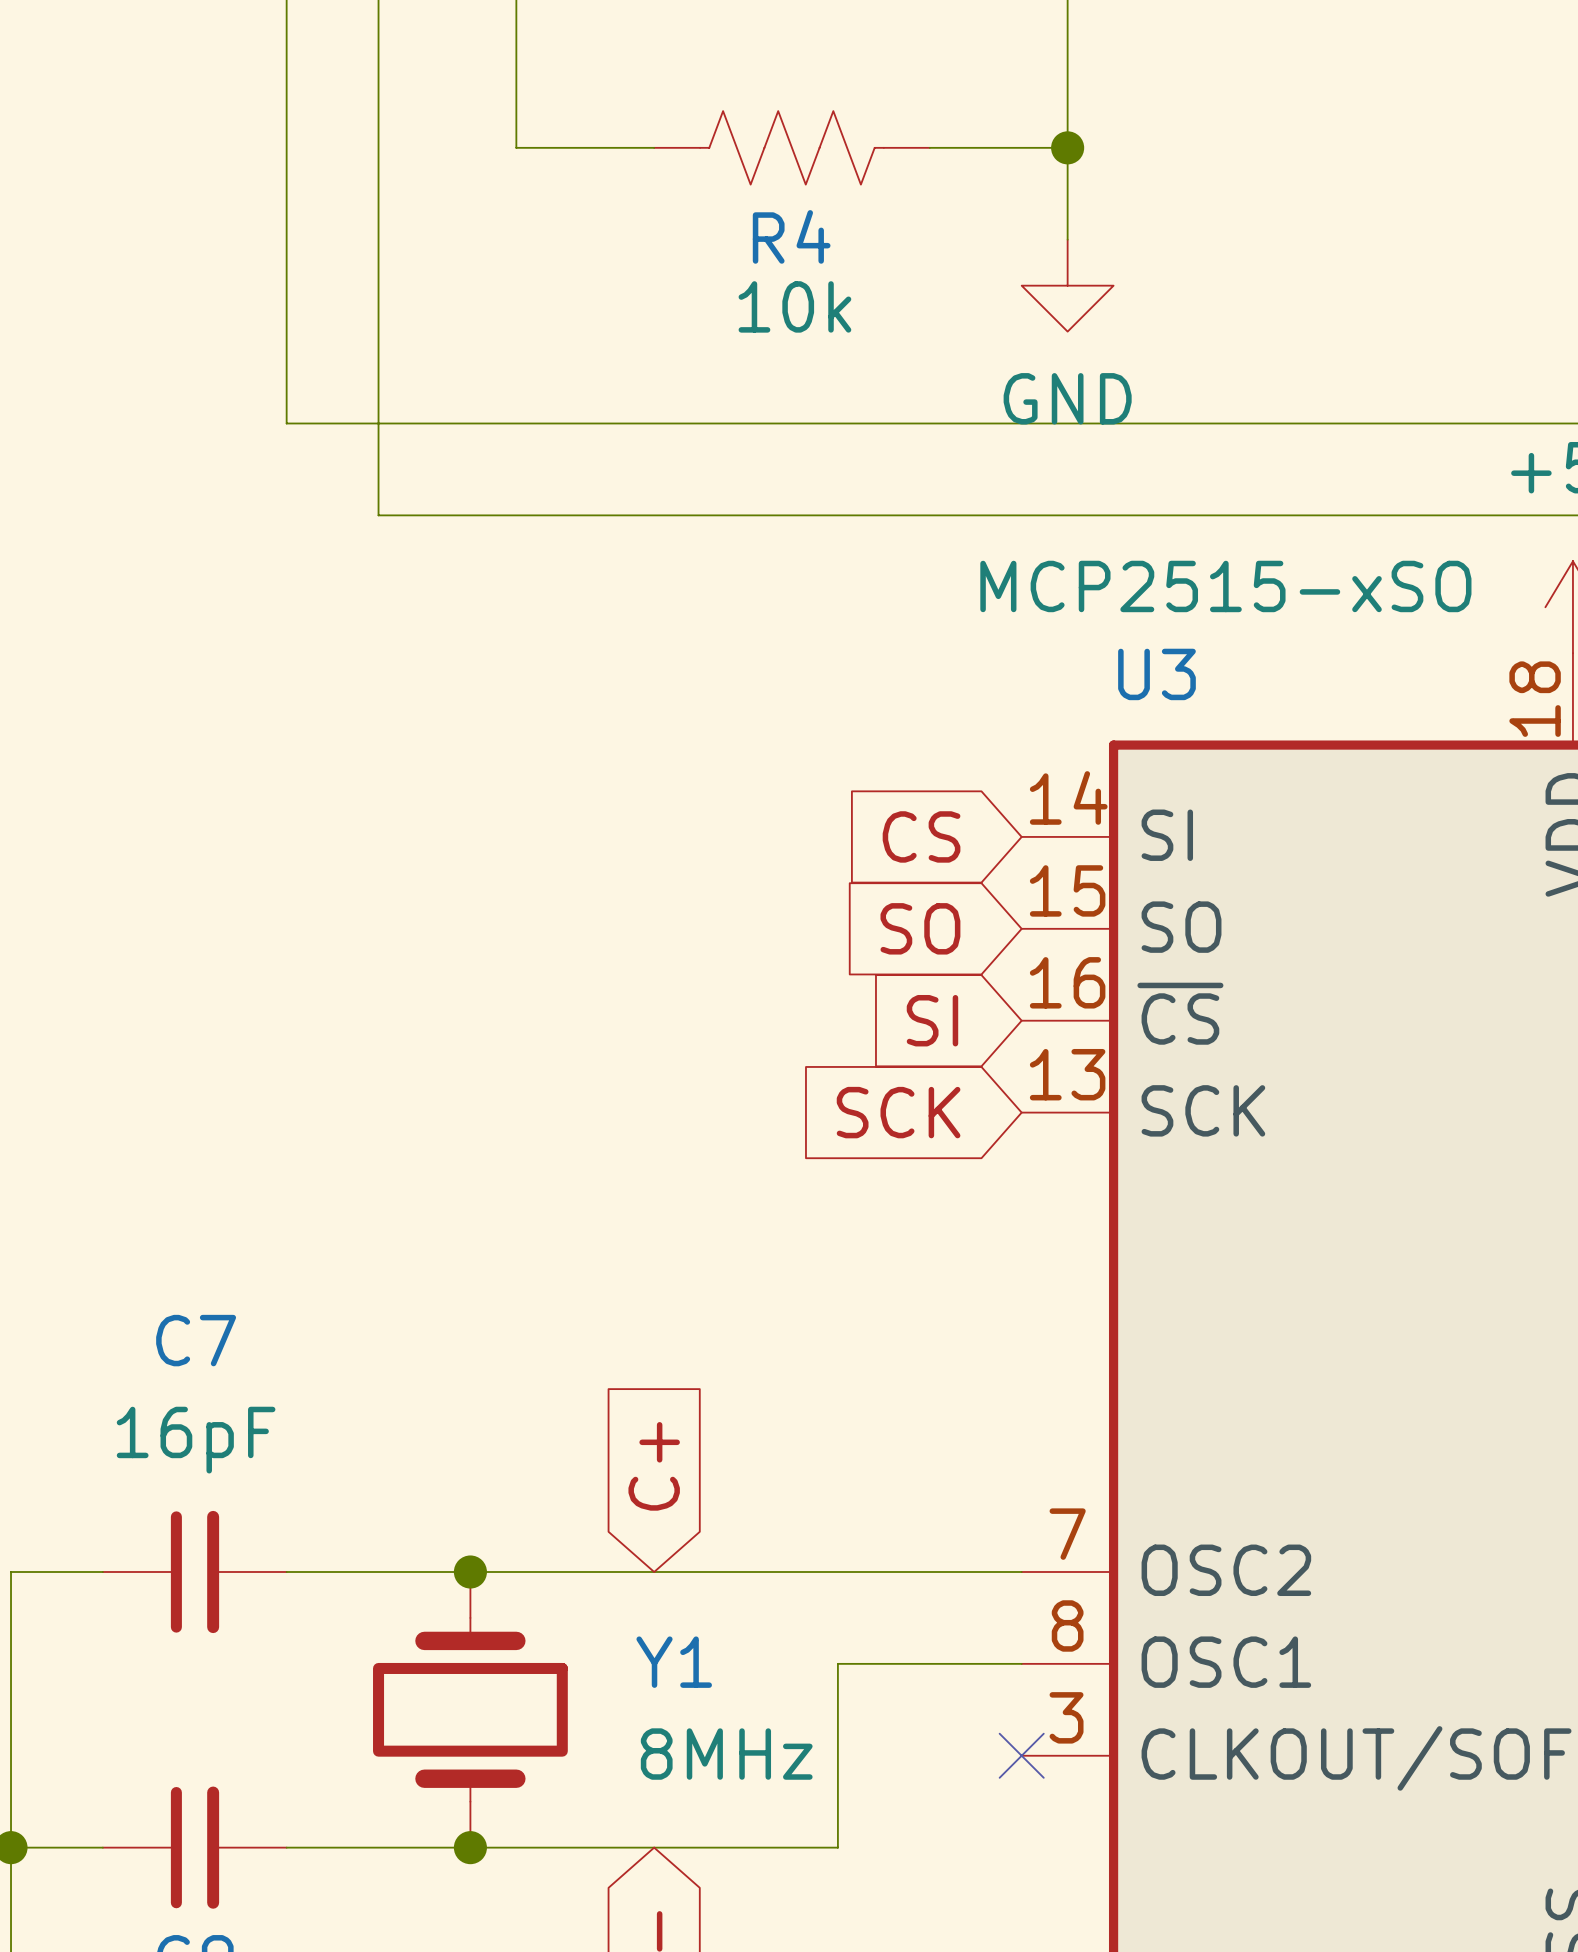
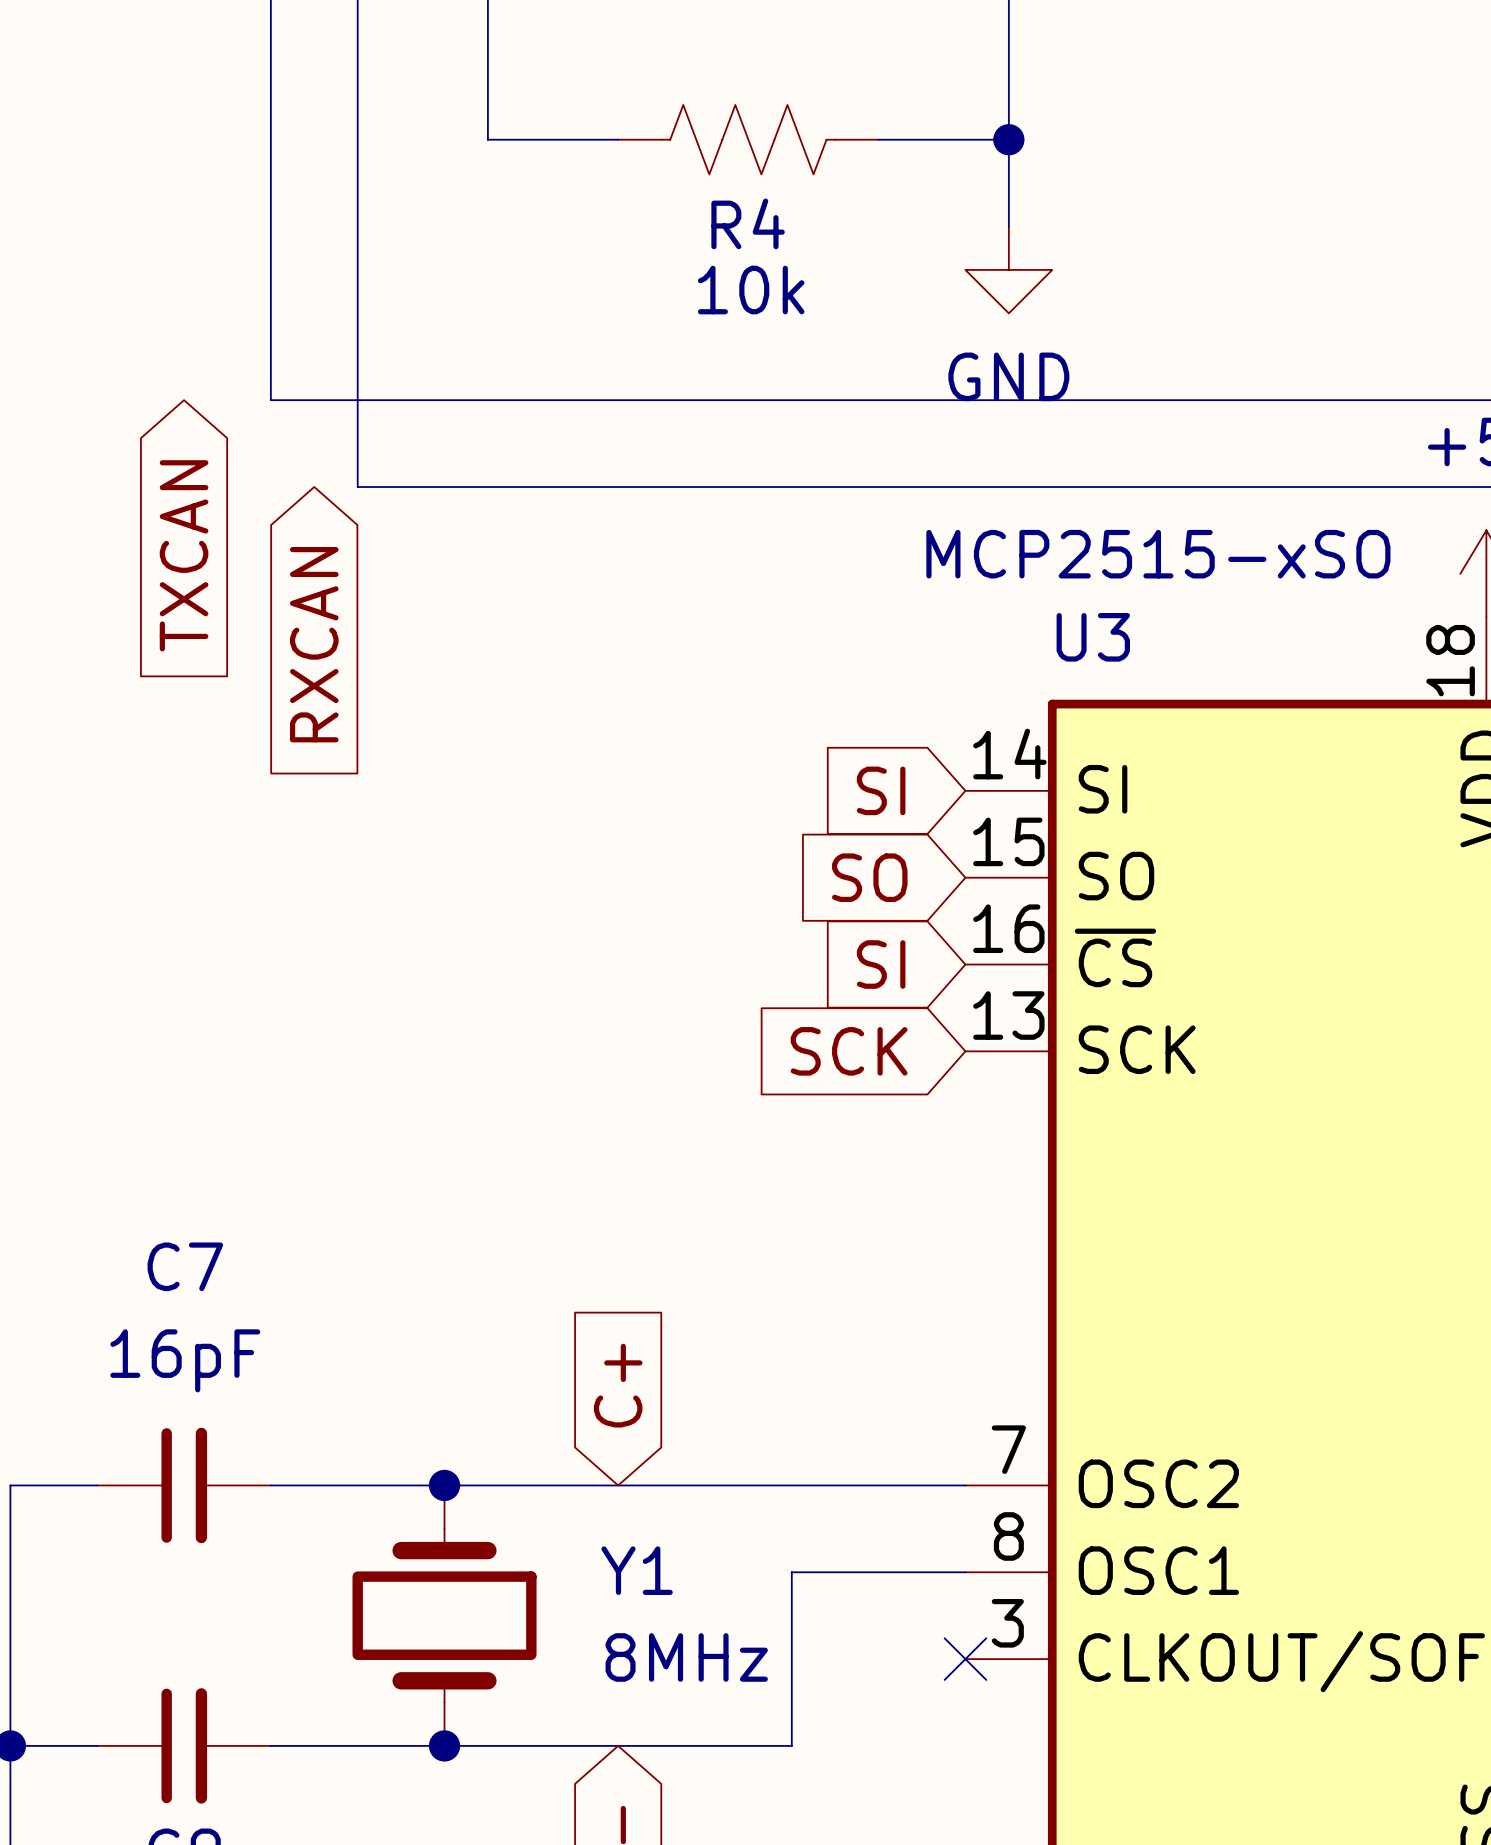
global label: none -> TXCAN (184, 555)
global label: none -> RXCAN (314, 644)
global label: CS (921, 836) -> SI (881, 790)

